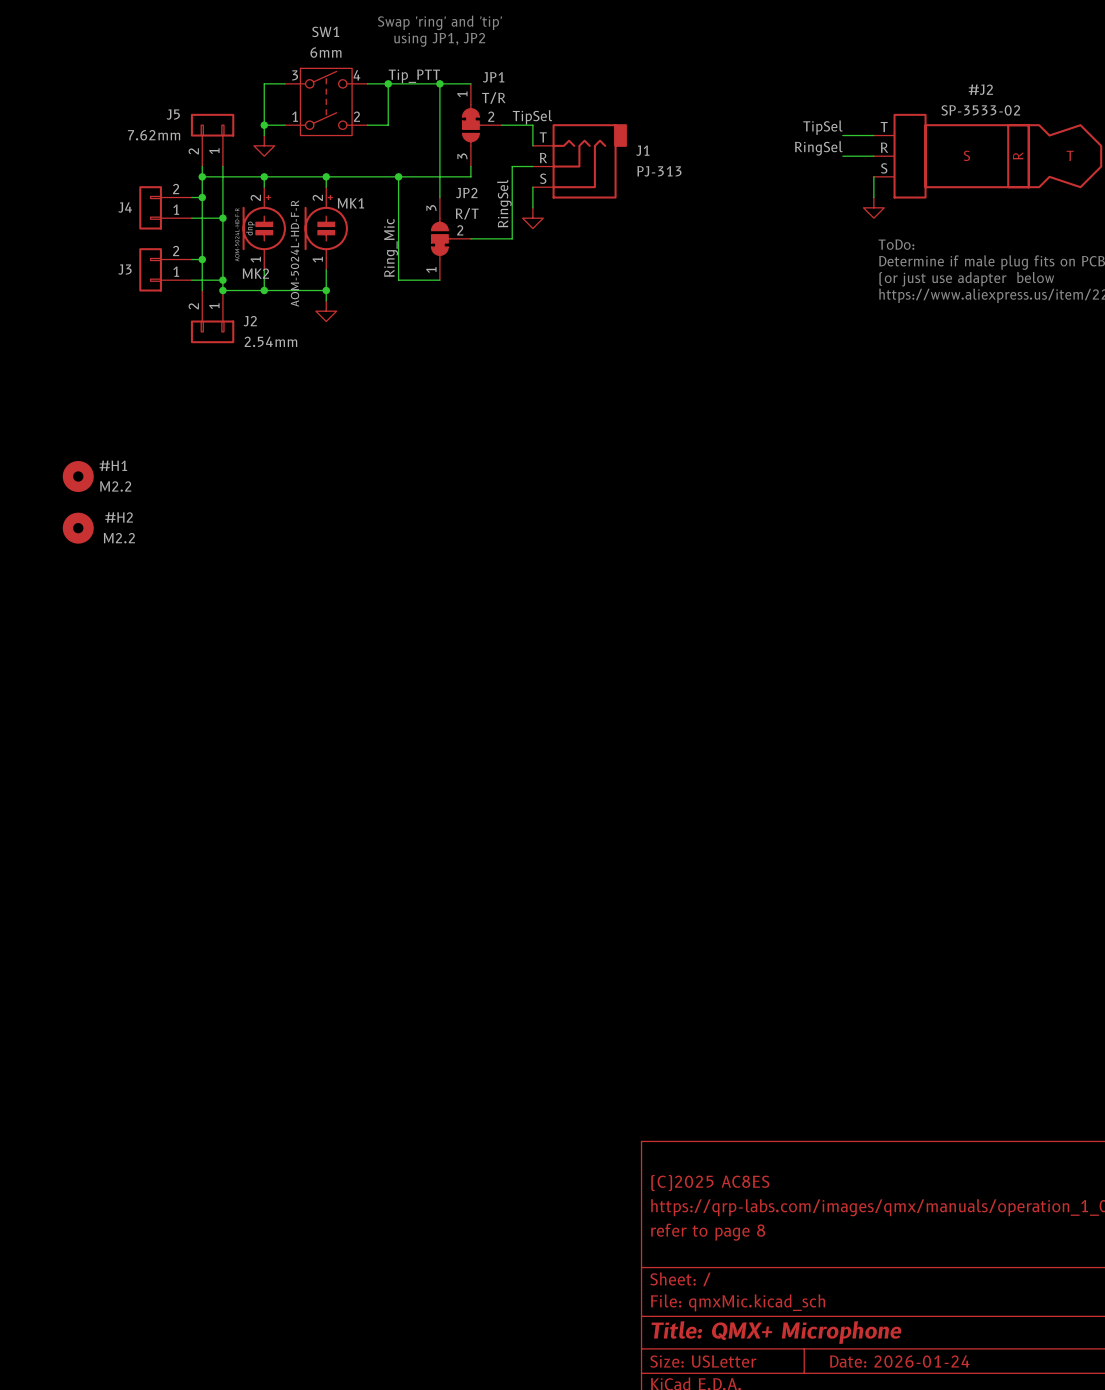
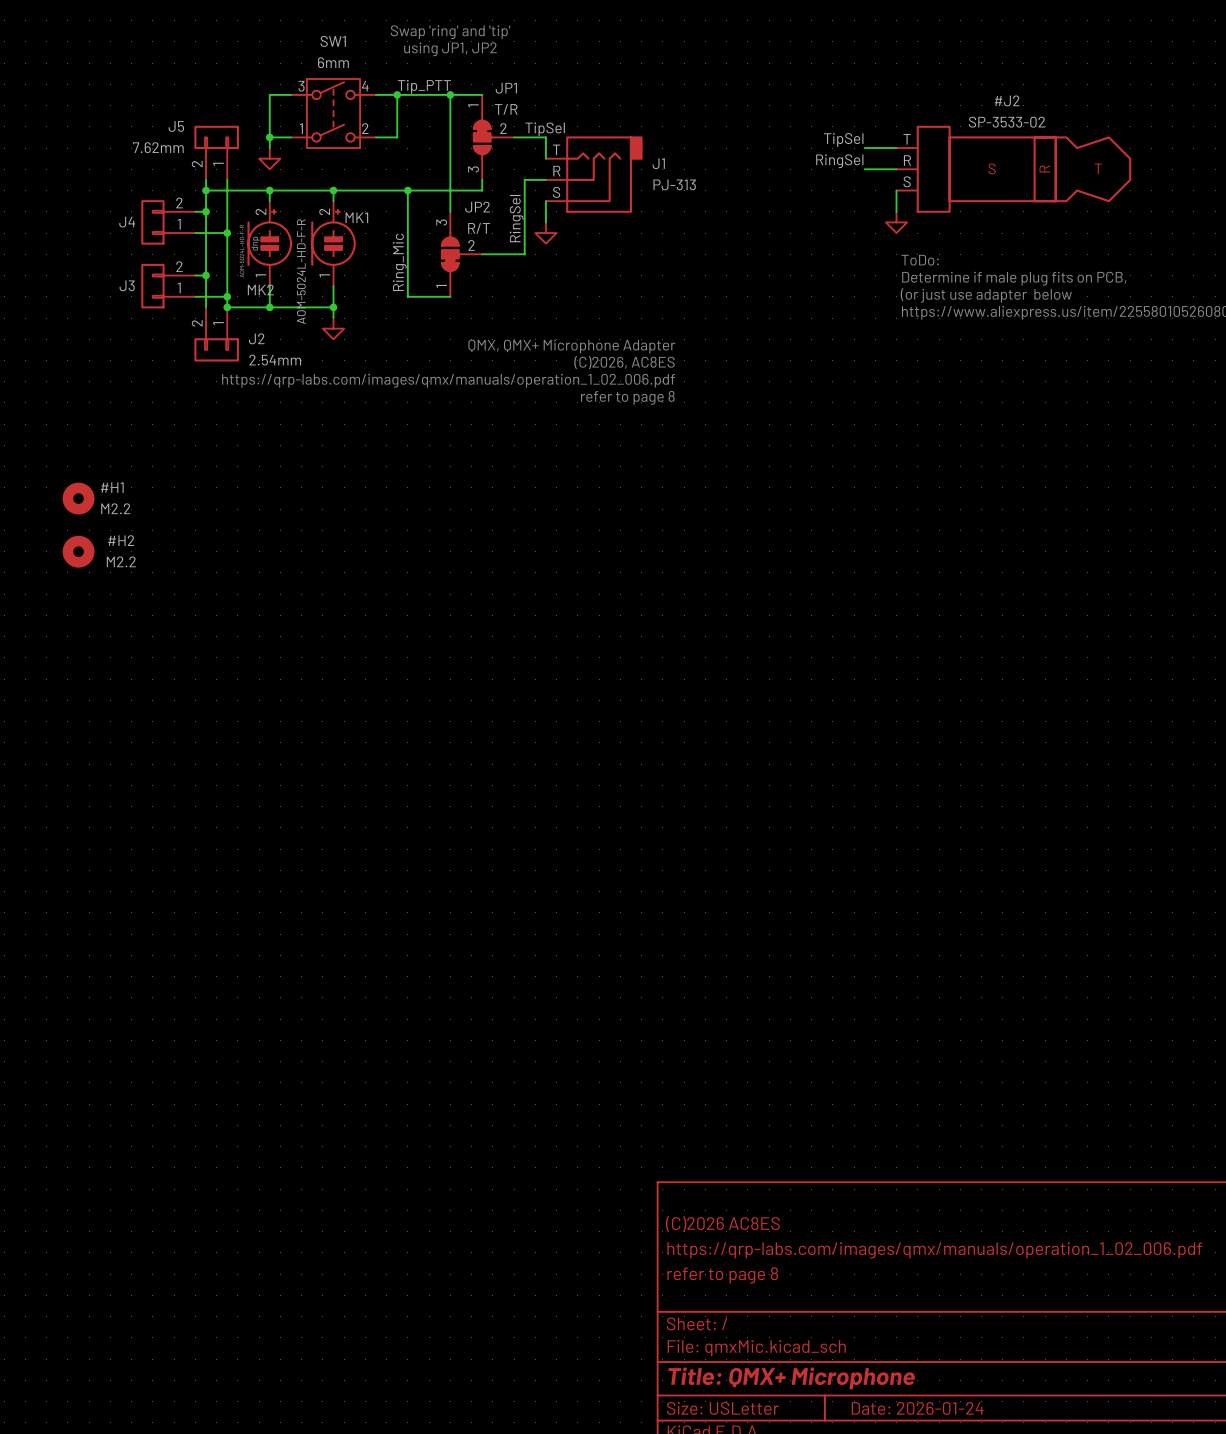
text: none -> QMX, QMX+ Microphone Adapter (571, 346)
text: none -> (C)2026, AC8ES (624, 362)
text: none -> https://qrp-labs.com/images/qmx/manuals/operation_1_02_006.pdf (448, 380)
text: none -> refer to page 8 (627, 397)
title block: (C)2025 AC8ES (710, 1183) -> (C)2026 AC8ES (722, 1223)

